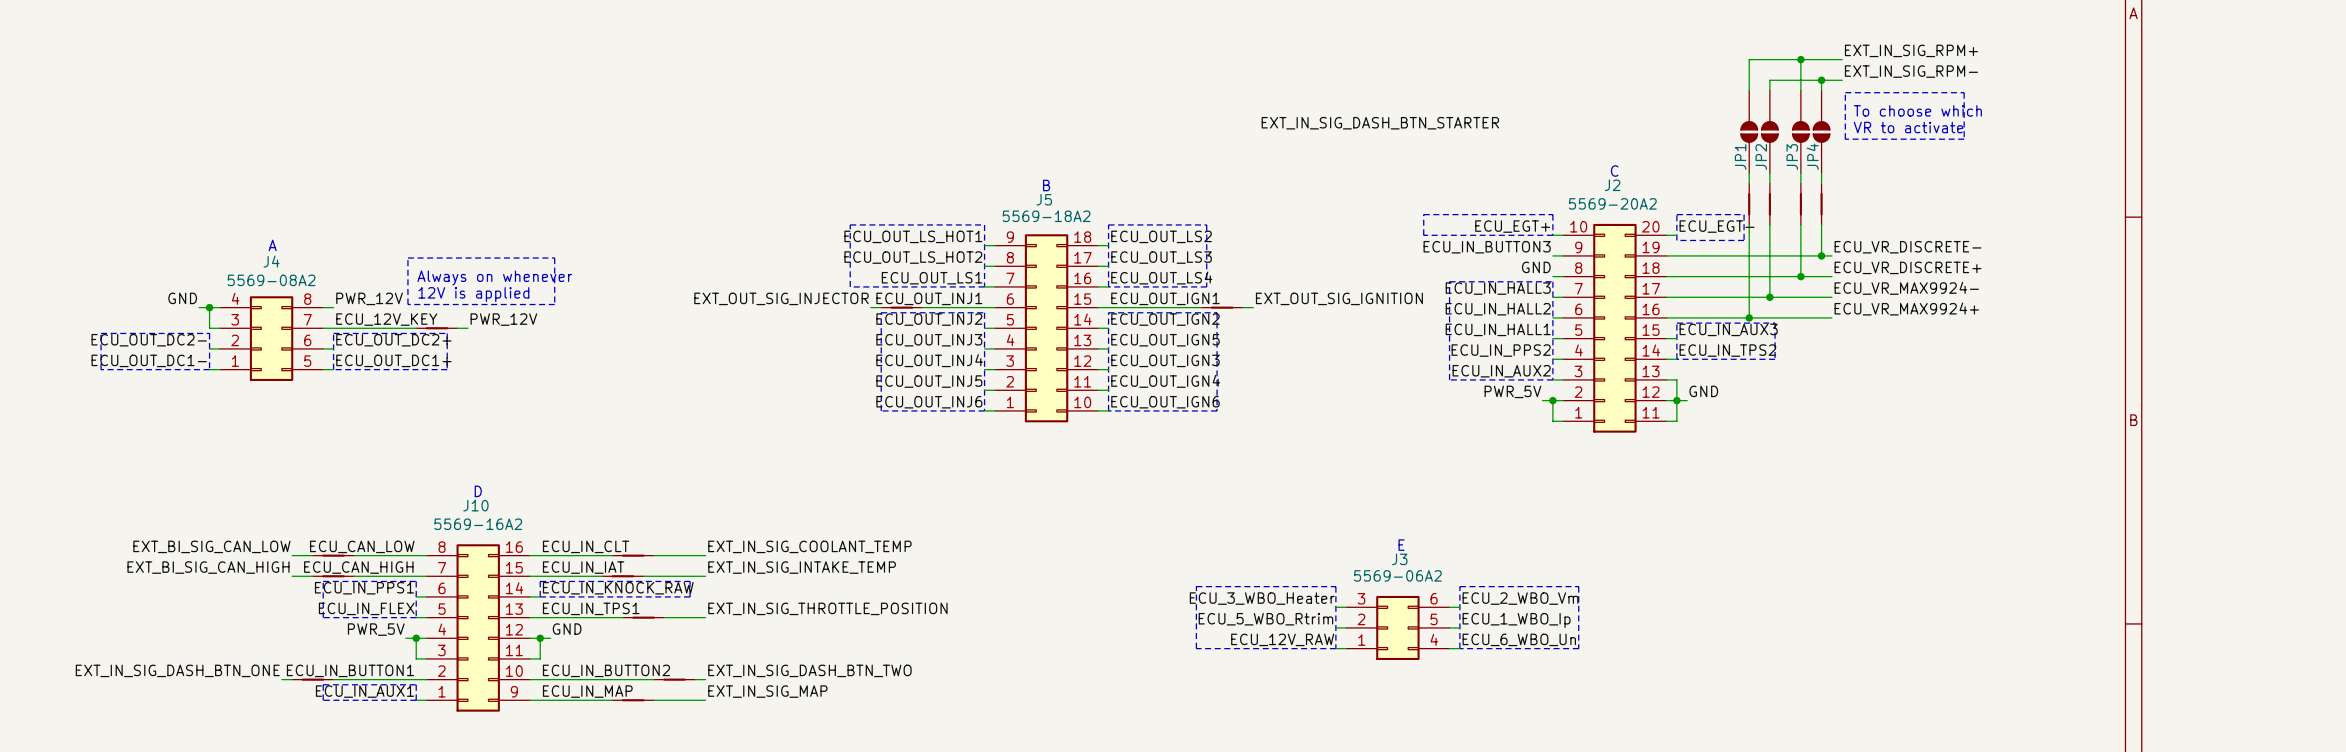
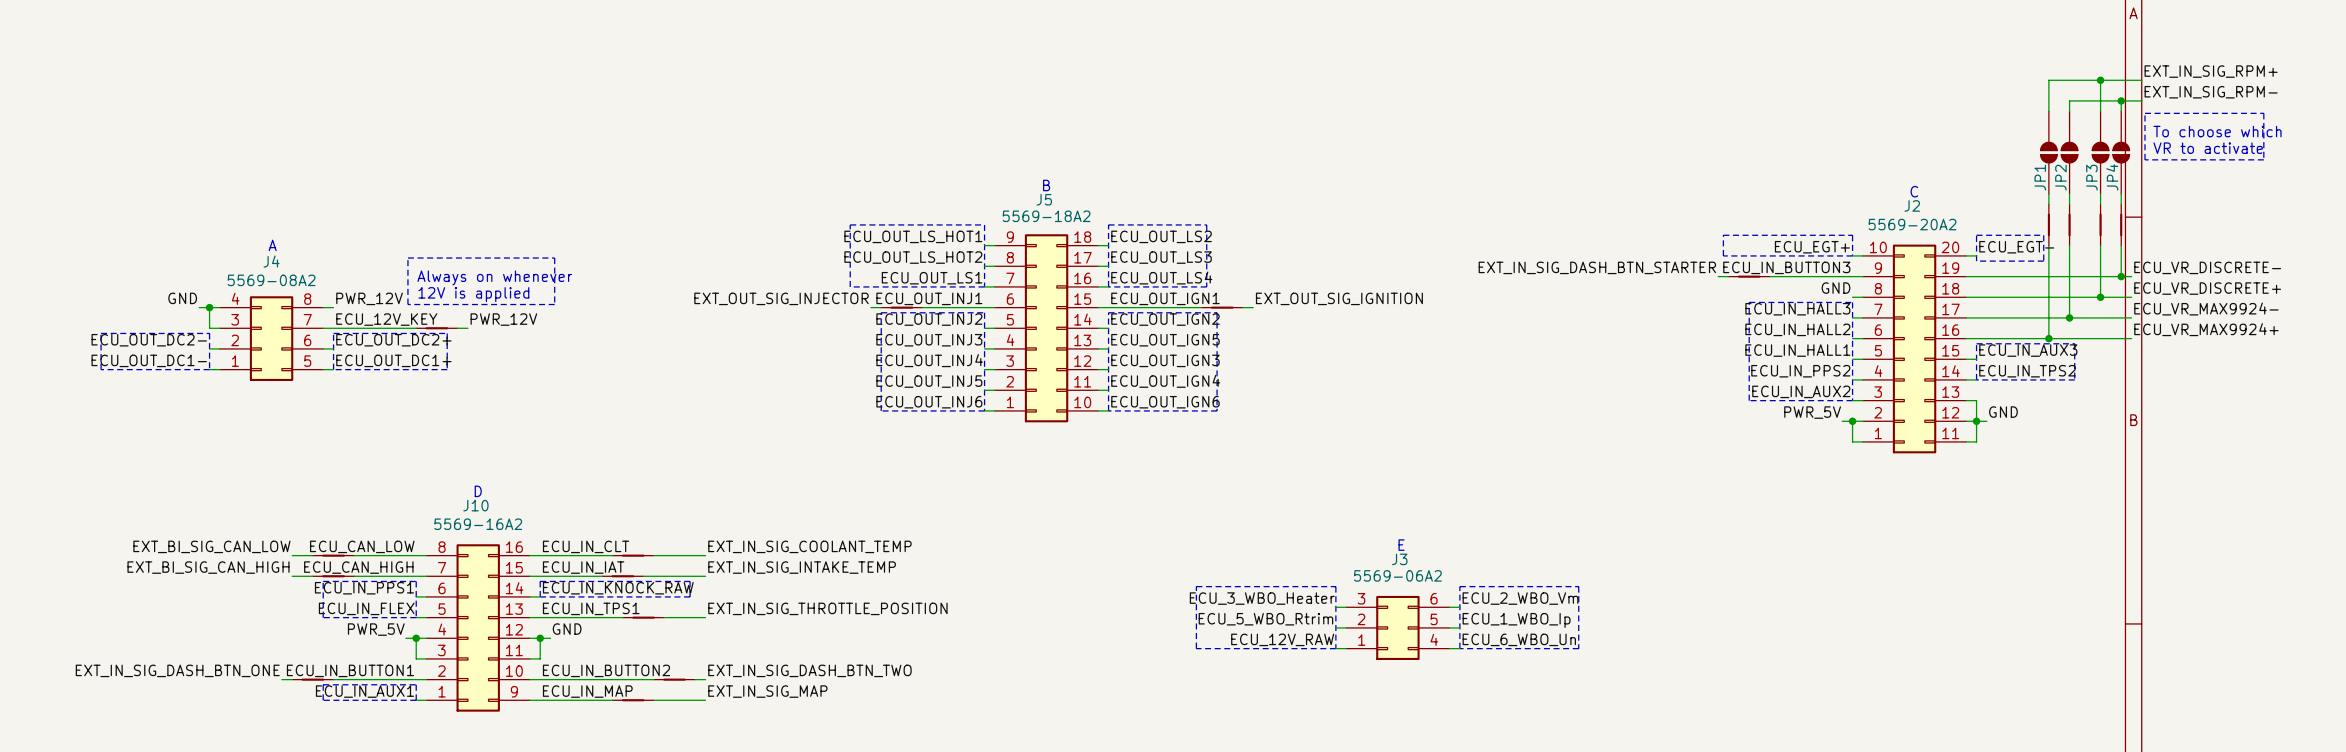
label: EXT_IN_SIG_RPM+ (1911, 50) -> none
wire: (1800, 59) (1800, 90) -> none
junction: (1800, 59) -> none
wire: (1842, 59) (1749, 59) (1749, 90) -> none
label: EXT_IN_SIG_RPM- (1911, 71) -> none
label: none -> EXT_IN_SIG_RPM+ (2211, 71)
wire: (1821, 80) (1821, 90) -> none
junction: (1821, 80) -> none
wire: (1842, 80) (1769, 80) (1769, 90) -> none
wire: none -> (2100, 80) (2100, 111)
junction: none -> (2100, 80)
wire: none -> (2141, 80) (2048, 80) (2048, 111)
line: (1845, 92) (1964, 92) (1964, 139) (1845, 139) (1845, 92) -> none
label: none -> EXT_IN_SIG_RPM- (2211, 92)
wire: none -> (2121, 100) (2121, 111)
junction: none -> (2121, 100)
wire: none -> (2141, 100) (2069, 100) (2069, 111)
text: To choose which (1917, 110) -> none
line: none -> (2144, 113) (2263, 113) (2263, 159) (2144, 159) (2144, 113)
label: EXT_IN_SIG_DASH_BTN_STARTER (1380, 123) -> none
text: VR to activate (1908, 127) -> none
JP1 position: (1749, 131) -> (2048, 152)
JP2 position: (1769, 131) -> (2069, 152)
JP3 position: (1800, 131) -> (2100, 152)
JP4 position: (1821, 131) -> (2121, 152)
text: none -> To choose which (2217, 131)
text: none -> VR to activate (2208, 148)
text: C (1614, 171) -> none
wire: (1749, 173) (1749, 183) -> none
wire: (1769, 173) (1769, 183) -> none
wire: (1800, 173) (1800, 183) -> none
wire: (1821, 173) (1821, 183) -> none
text: none -> C (1914, 191)
wire: none -> (2048, 193) (2048, 204)
wire: none -> (2069, 193) (2069, 204)
wire: none -> (2100, 193) (2100, 204)
wire: none -> (2121, 193) (2121, 204)
part: (1749, 204) -> none
part: (1769, 204) -> none
part: (1800, 204) -> none
part: (1821, 204) -> none
line: (1423, 214) (1552, 214) (1552, 235) (1423, 235) (1423, 214) -> none
line: (1676, 214) (1744, 214) (1744, 240) (1676, 240) (1676, 214) -> none
wire: (1749, 224) (1749, 317) -> none
wire: (1769, 224) (1769, 297) -> none
wire: (1800, 224) (1800, 276) -> none
wire: (1821, 224) (1821, 255) -> none
part: none -> (2048, 224)
part: none -> (2069, 224)
part: none -> (2100, 224)
part: none -> (2121, 224)
label: ECU_EGT+ (1512, 226) -> none
label: ECU_EGT- (1717, 226) -> ECU_EGT+ (1812, 247)
wire: (1552, 235) (1563, 235) -> none
wire: (1666, 235) (1676, 235) -> (1852, 255) (1862, 255)
line: none -> (1723, 235) (1852, 235) (1852, 255) (1723, 255) (1723, 235)
line: none -> (1976, 235) (2043, 235) (2043, 261) (1976, 261) (1976, 235)
wire: none -> (2048, 245) (2048, 338)
wire: none -> (2069, 245) (2069, 317)
wire: none -> (2100, 245) (2100, 297)
wire: none -> (2121, 245) (2121, 276)
label: ECU_IN_BUTTON3 (1487, 247) -> none
label: ECU_VR_DISCRETE- (1907, 247) -> none
label: none -> ECU_EGT- (2016, 247)
wire: (1552, 255) (1563, 255) -> none
wire: (1666, 255) (1831, 255) -> none
junction: (1821, 255) -> none
wire: none -> (1966, 255) (1976, 255)
label: GND (1536, 267) -> none
label: none -> EXT_IN_SIG_DASH_BTN_STARTER (1597, 267)
label: none -> ECU_IN_BUTTON3 (1786, 267)
label: ECU_VR_DISCRETE+ (1907, 267) -> none
label: none -> ECU_VR_DISCRETE- (2207, 267)
wire: (1552, 276) (1563, 276) -> none
wire: (1666, 276) (1718, 276) -> none
part: none -> (1749, 276)
junction: (1800, 276) -> none
wire: none -> (1831, 276) (1862, 276)
wire: none -> (1966, 276) (2131, 276)
junction: none -> (2121, 276)
line: (1449, 281) (1552, 281) (1552, 379) (1449, 379) (1449, 281) -> none
label: ECU_IN_HALL3 (1498, 288) -> none
label: none -> GND (1836, 288)
label: ECU_VR_MAX9924- (1906, 288) -> none
label: none -> ECU_VR_DISCRETE+ (2207, 288)
wire: (1552, 297) (1563, 297) -> none
wire: (1666, 297) (1831, 297) -> none
junction: (1769, 297) -> none
wire: none -> (1852, 297) (1862, 297)
wire: none -> (1966, 297) (2131, 297)
junction: none -> (2100, 297)
line: none -> (1749, 302) (1852, 302) (1852, 400) (1749, 400) (1749, 302)
label: ECU_VR_MAX9924+ (1906, 308) -> none
label: none -> ECU_VR_MAX9924- (2206, 308)
label: ECU_IN_HALL2 (1498, 309) -> none
label: none -> ECU_IN_HALL3 (1797, 309)
wire: (1552, 317) (1563, 317) -> none
wire: (1666, 317) (1831, 317) -> none
junction: (1749, 317) -> none
wire: none -> (1852, 317) (1862, 317)
wire: none -> (1966, 317) (2131, 317)
junction: none -> (2069, 317)
line: (1676, 323) (1676, 359) (1775, 359) (1775, 323) (1676, 323) -> none
J2 position: (1614, 328) -> (1914, 348)
label: ECU_IN_HALL1 (1498, 329) -> none
label: ECU_IN_AUX3 (1728, 329) -> none
label: none -> ECU_IN_HALL2 (1797, 329)
label: none -> ECU_VR_MAX9924+ (2206, 329)
wire: (1552, 338) (1563, 338) -> none
wire: (1666, 338) (1676, 338) -> (1852, 359) (1862, 359)
wire: none -> (1852, 338) (1862, 338)
wire: none -> (1966, 338) (2131, 338)
junction: none -> (2048, 338)
line: none -> (1976, 343) (1976, 379) (2074, 379) (2074, 343) (1976, 343)
label: ECU_IN_PPS2 (1501, 350) -> none
label: ECU_IN_TPS2 (1727, 350) -> none
label: none -> ECU_IN_HALL1 (1797, 350)
label: none -> ECU_IN_AUX3 (2028, 350)
wire: (1552, 359) (1563, 359) -> none
wire: (1666, 359) (1676, 359) -> (1852, 379) (1862, 379)
wire: none -> (1966, 359) (1976, 359)
label: ECU_IN_AUX2 (1501, 371) -> none
label: none -> ECU_IN_PPS2 (1800, 371)
label: none -> ECU_IN_TPS2 (2027, 371)
wire: (1552, 379) (1563, 379) -> none
wire: (1666, 379) (1676, 379) (1676, 421) (1666, 421) -> none
wire: none -> (1966, 379) (1976, 379)
label: PWR_5V (1512, 391) -> none
label: GND (1703, 391) -> none
label: none -> ECU_IN_AUX2 (1801, 391)
wire: (1542, 400) (1563, 400) -> none
wire: (1552, 400) (1552, 421) (1563, 421) -> none
junction: (1552, 400) -> none
wire: (1666, 400) (1687, 400) -> (1842, 421) (1862, 421)
junction: (1676, 400) -> none
wire: none -> (1852, 400) (1862, 400)
wire: none -> (1966, 400) (1976, 400) (1976, 441) (1966, 441)
label: none -> PWR_5V (1812, 412)
label: none -> GND (2003, 412)
wire: none -> (1852, 421) (1852, 441) (1862, 441)
junction: none -> (1852, 421)
wire: none -> (1966, 421) (1986, 421)
junction: none -> (1976, 421)

